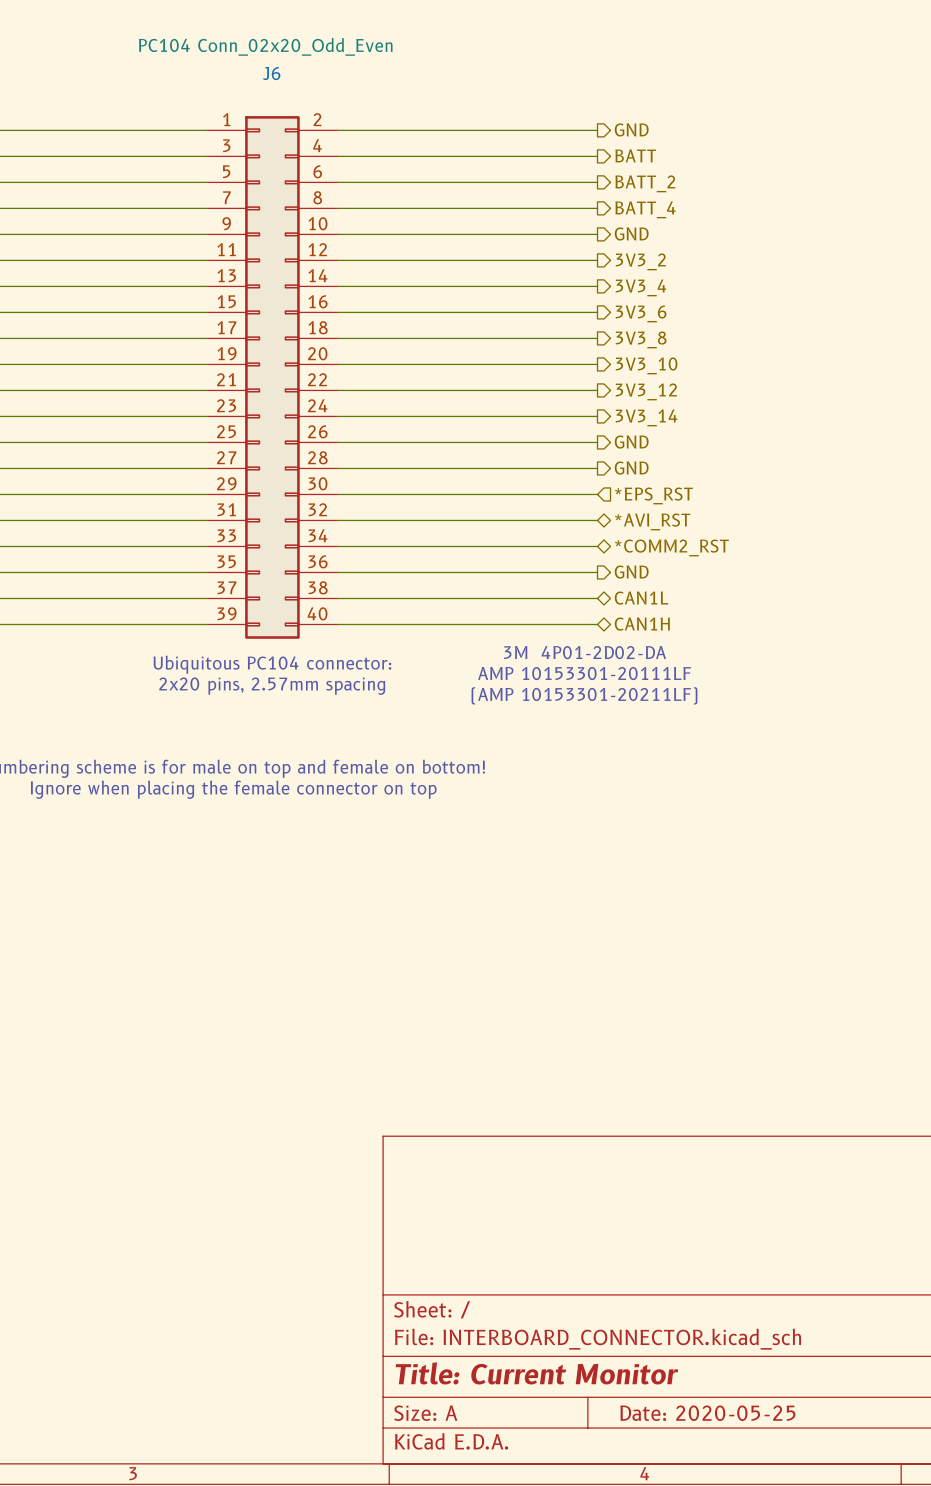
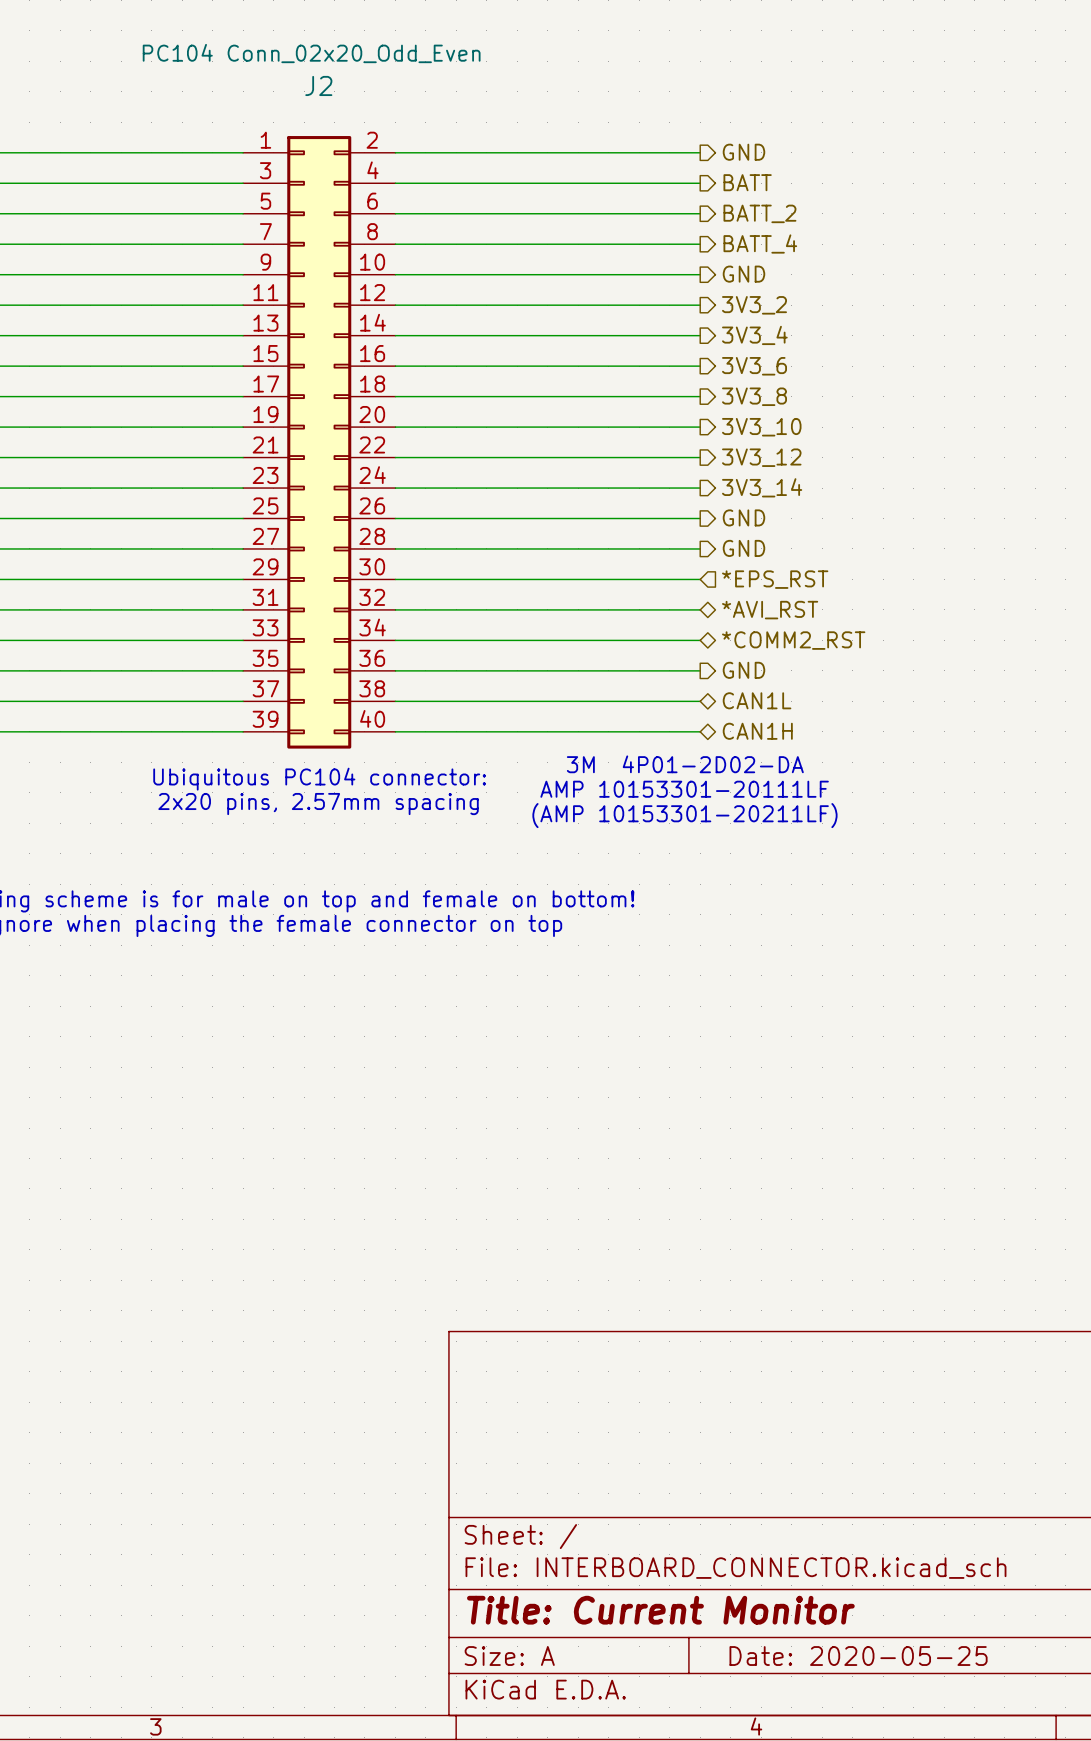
J6 name: J6 (271, 73) -> J2 (318, 85)

